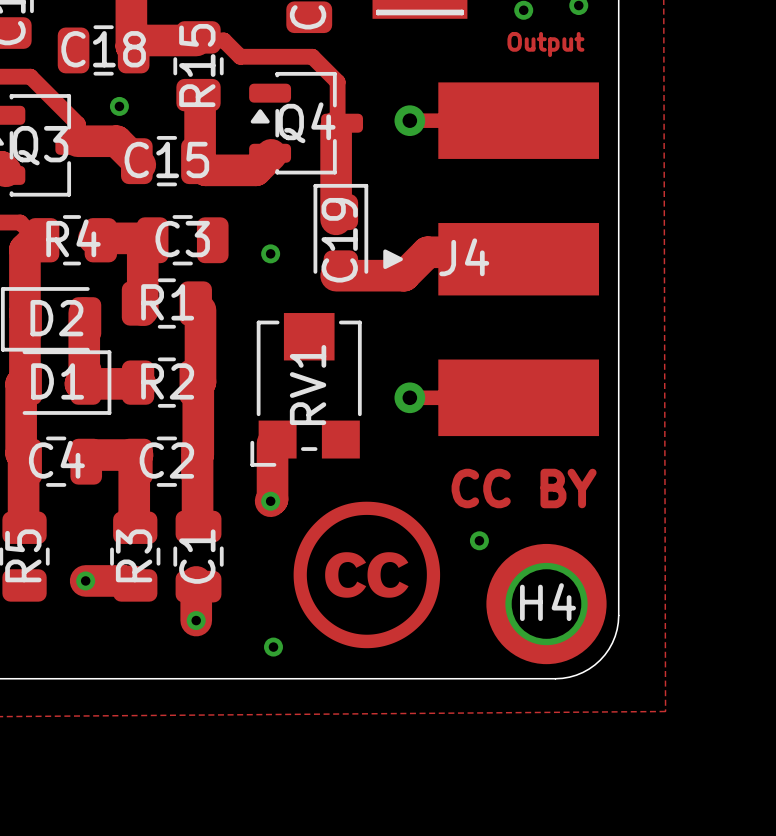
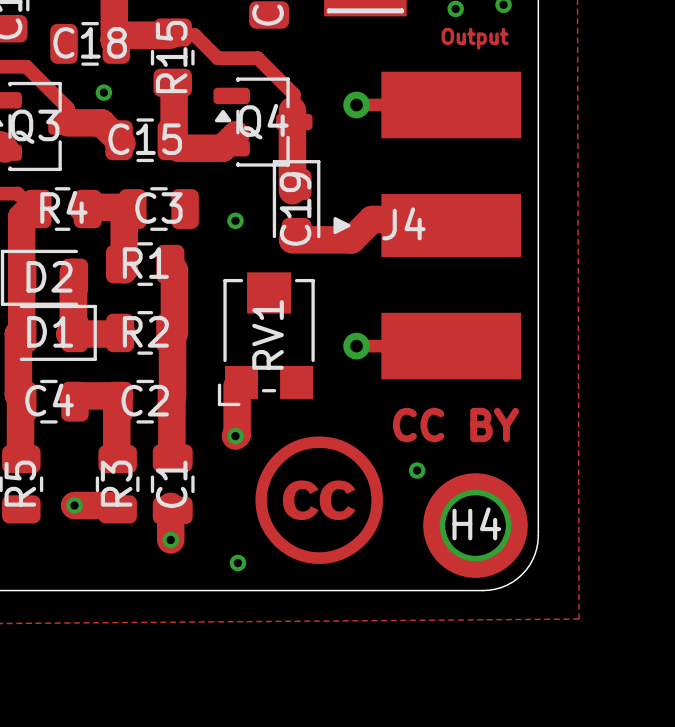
track: (240, 56) (312, 56) (337, 82) (337, 108) -> (209, 49) (217, 58) (257, 58) (293, 94)
Q4 position: (306, 123) -> (263, 122)

